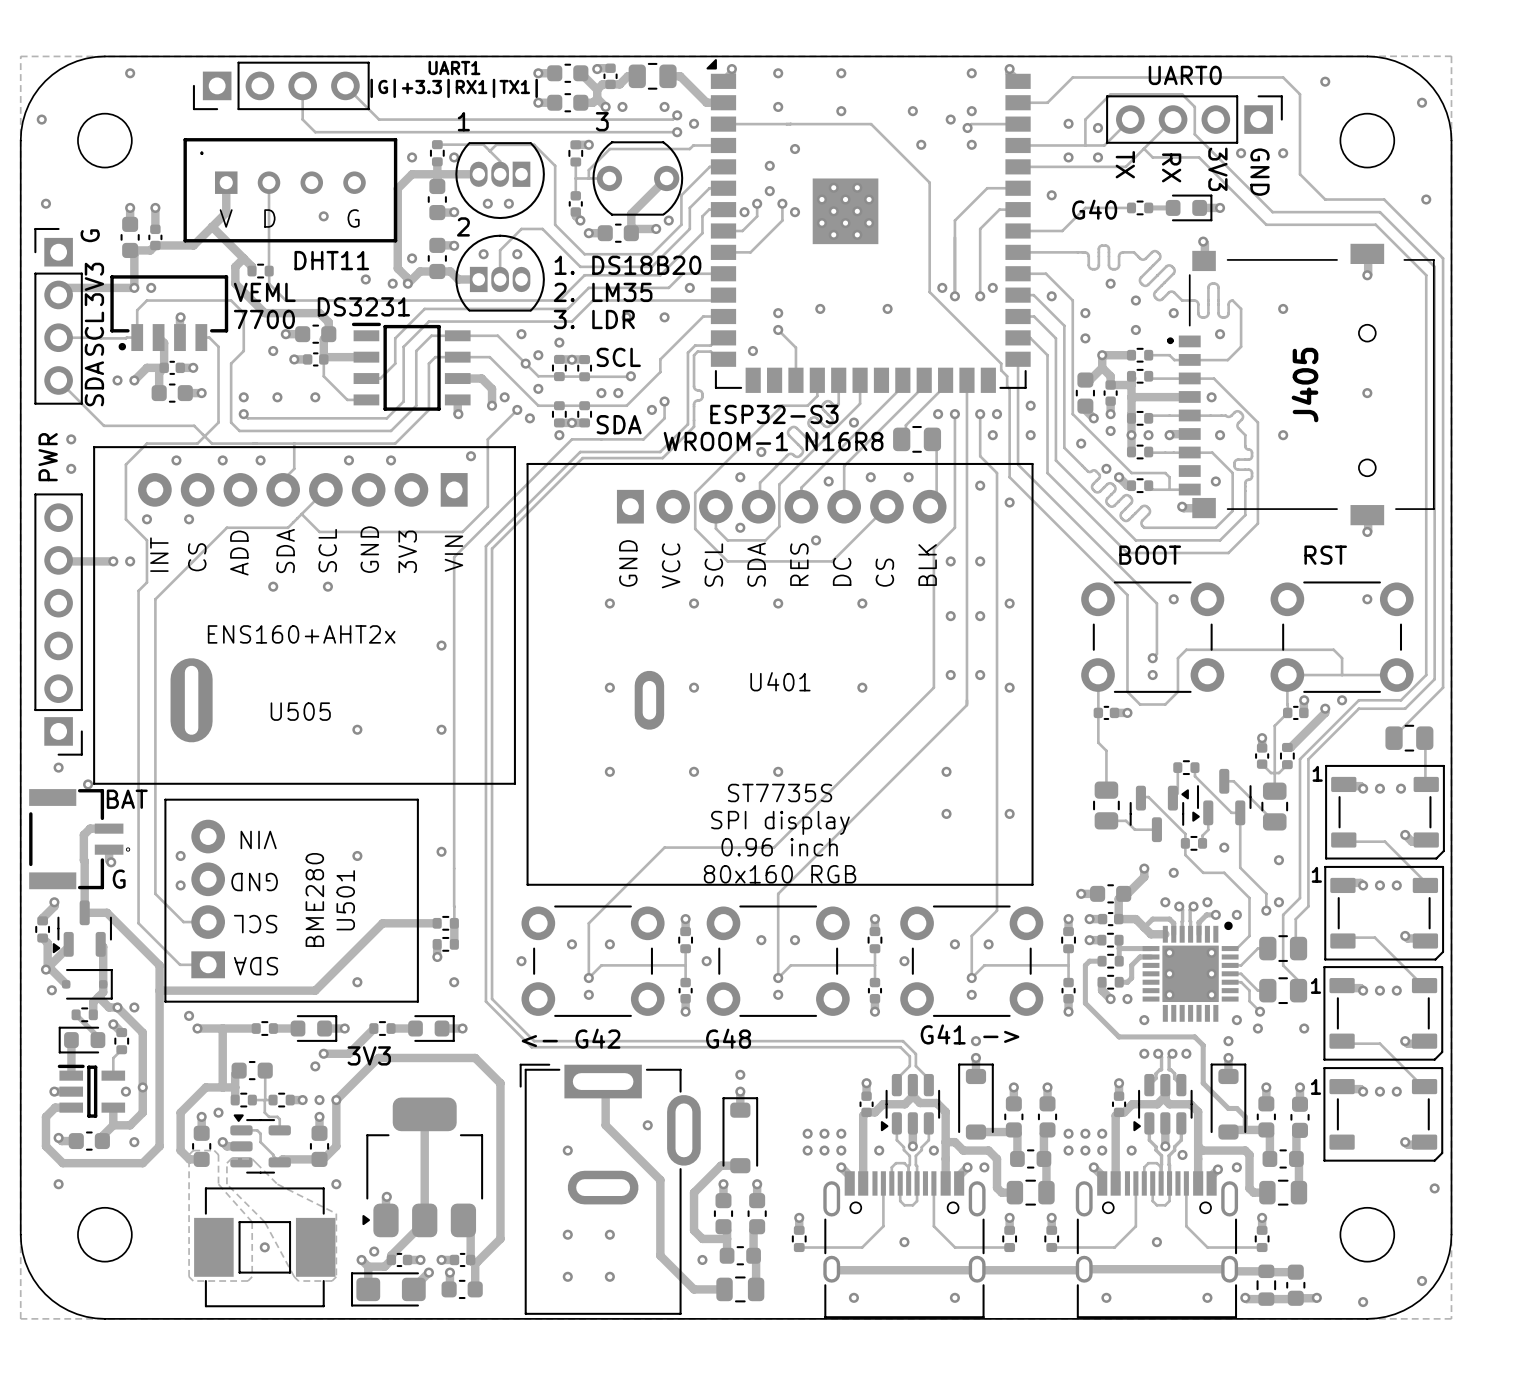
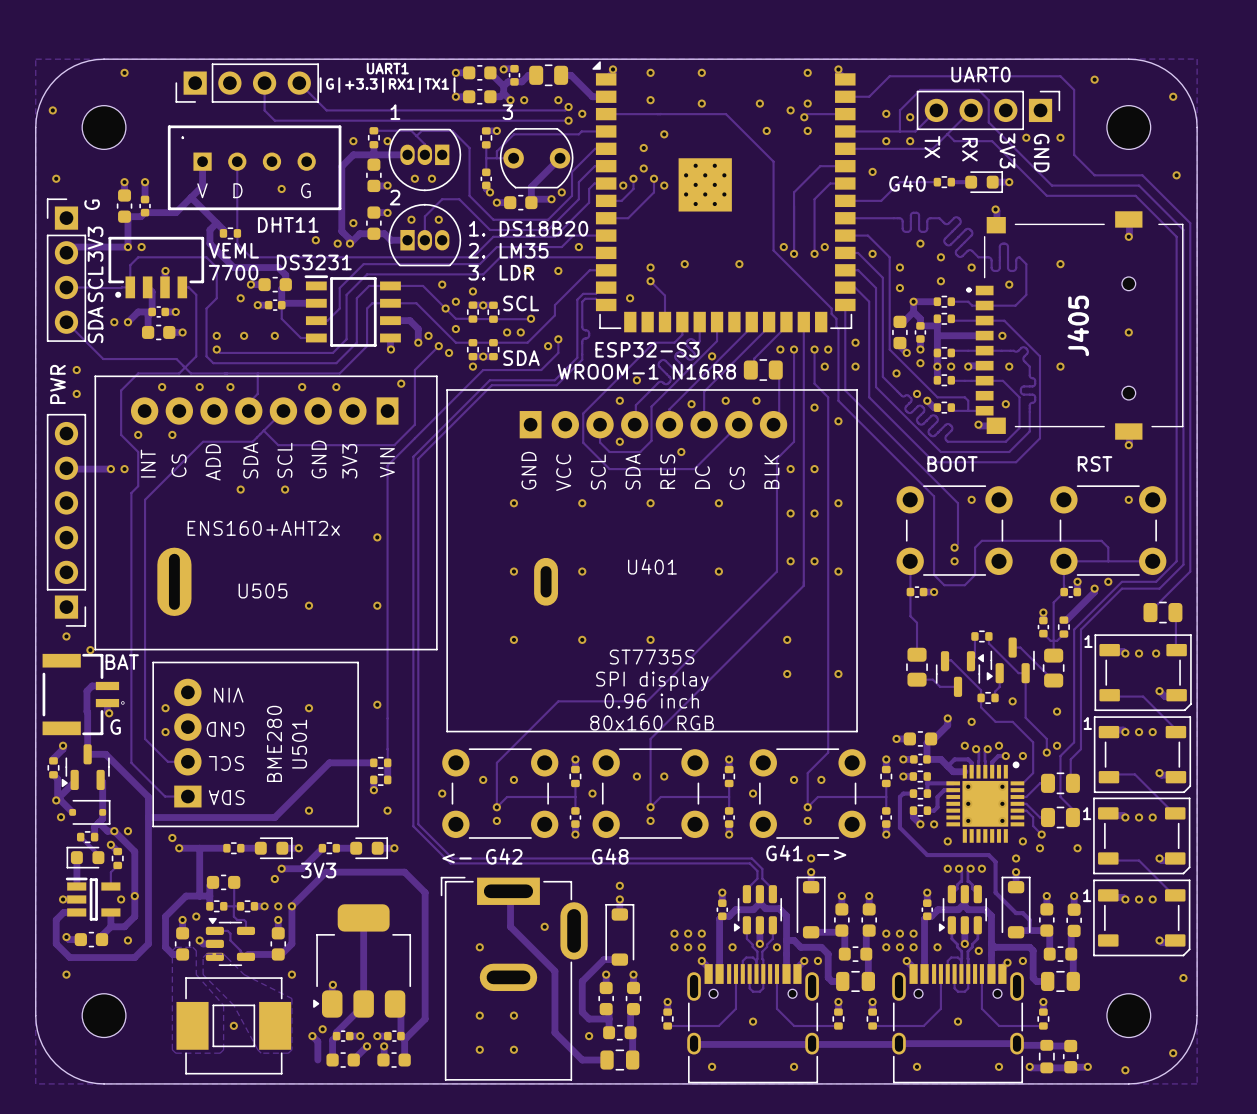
track: (386, 1264) (384, 1266) (368, 1266) -> (332, 1040) (332, 1060)
part footprint: [350, 1272, 426, 1307] -> [326, 1052, 360, 1068]

